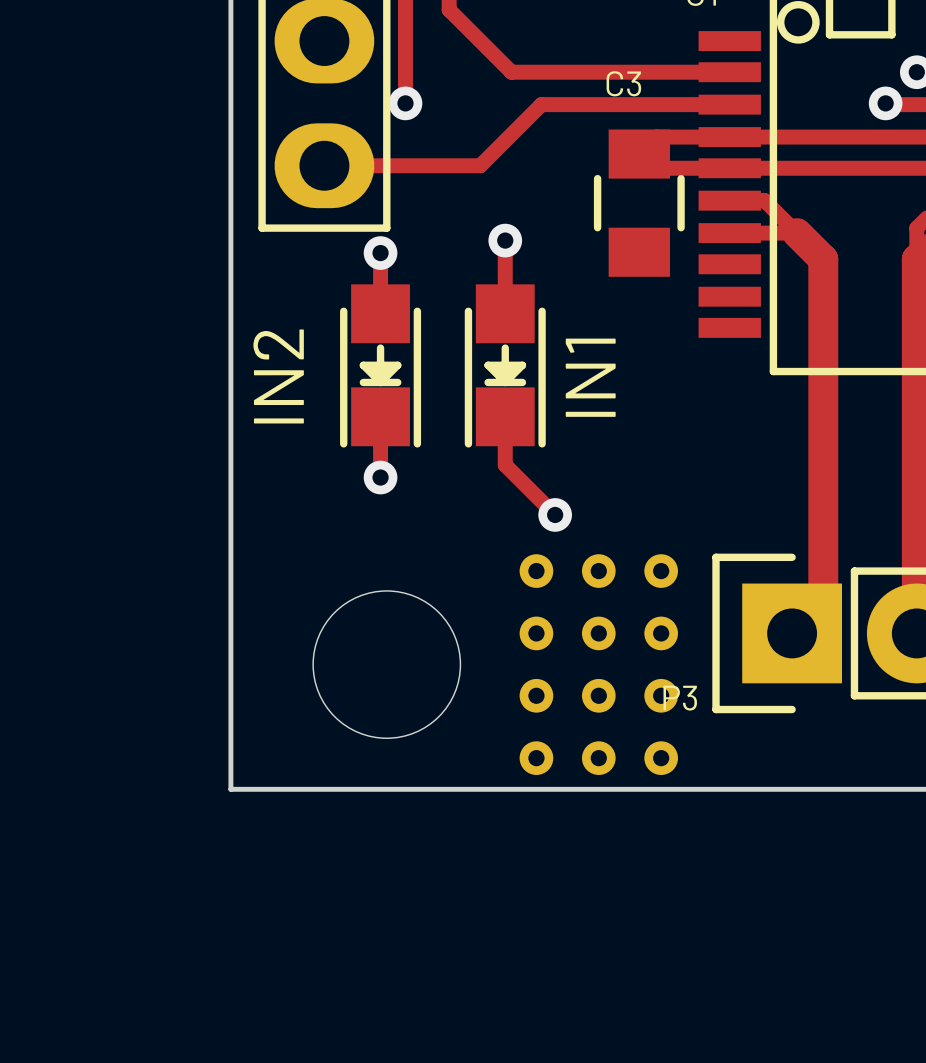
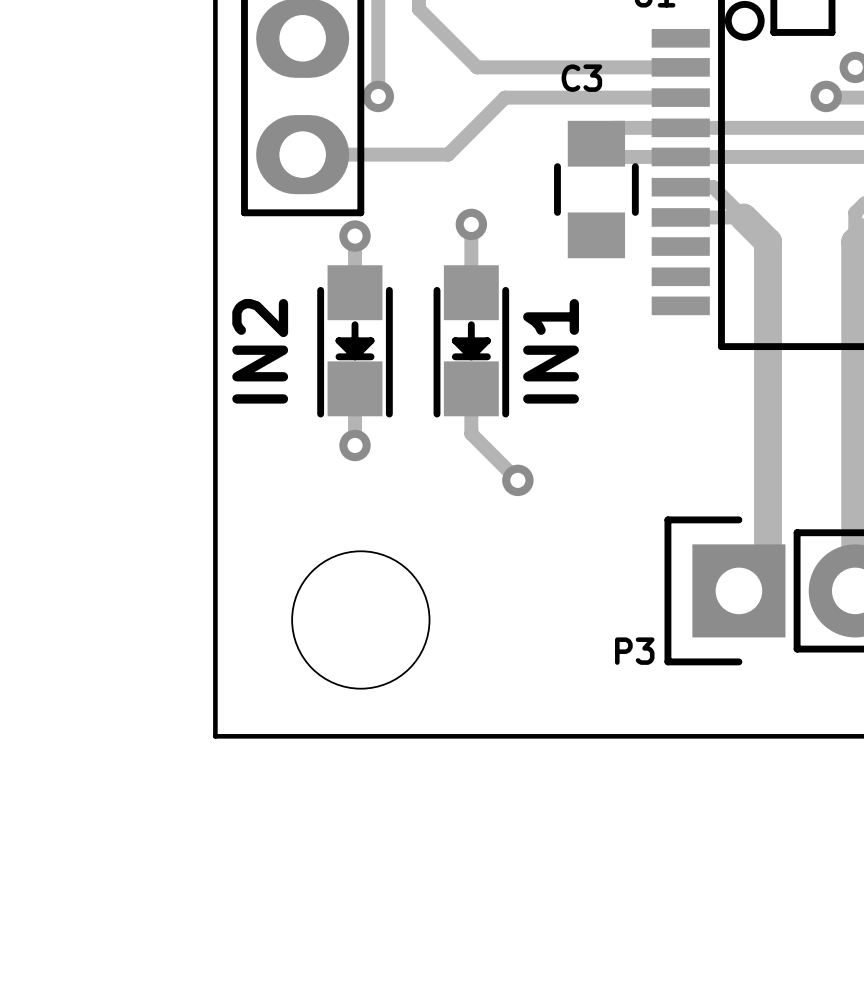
part: (536, 571) -> none
part: (598, 571) -> none
part: (661, 571) -> none
part: (536, 633) -> none
part: (598, 633) -> none
part: (661, 633) -> none
part: (536, 695) -> none
part: (598, 695) -> none
part: (661, 695) -> none
part: (536, 758) -> none
part: (598, 758) -> none
part: (661, 758) -> none

